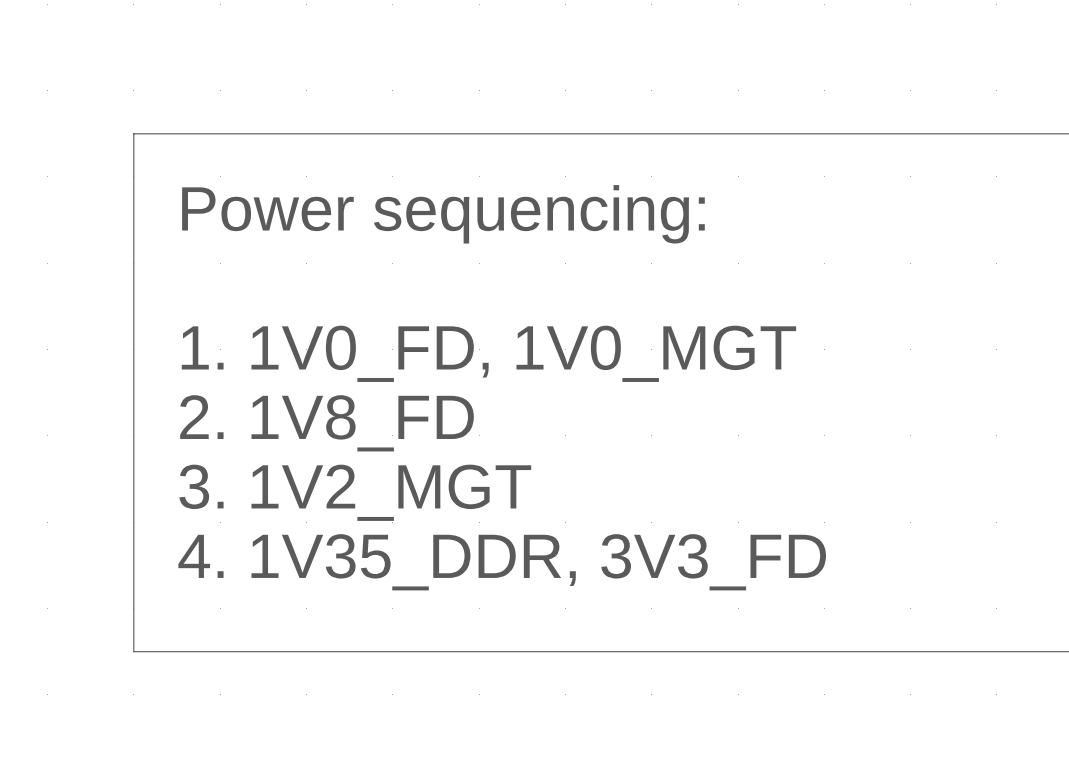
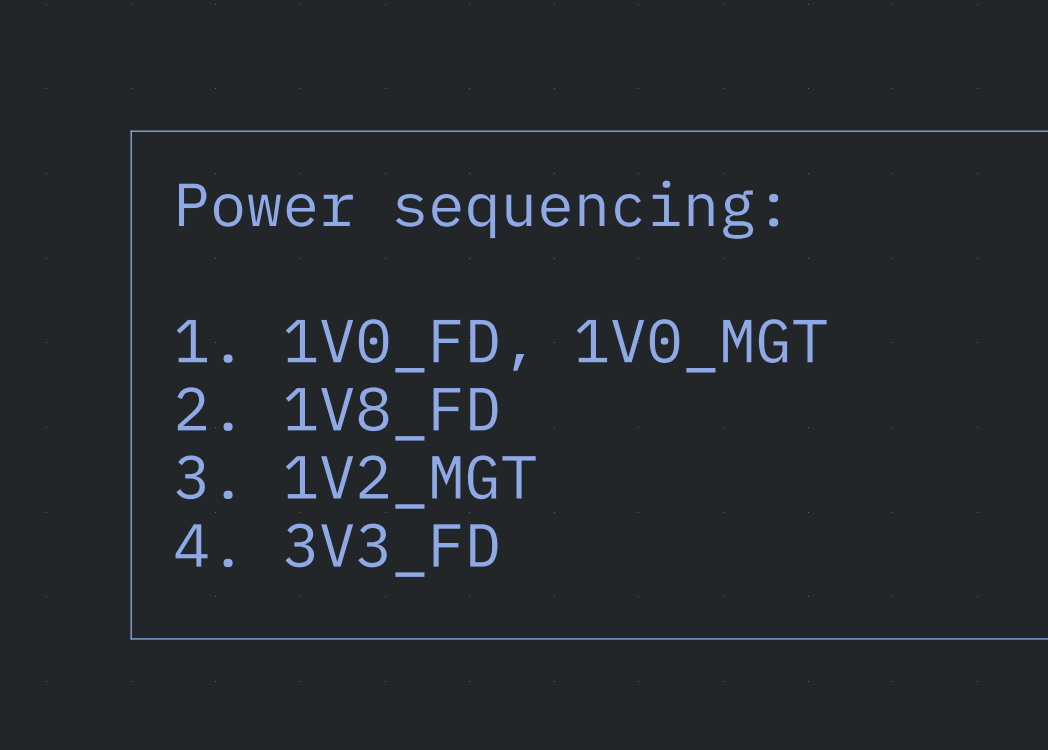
text: 4. 1V35_DDR, 3V3_FD (502, 562) -> 4. 3V3_FD (336, 550)

